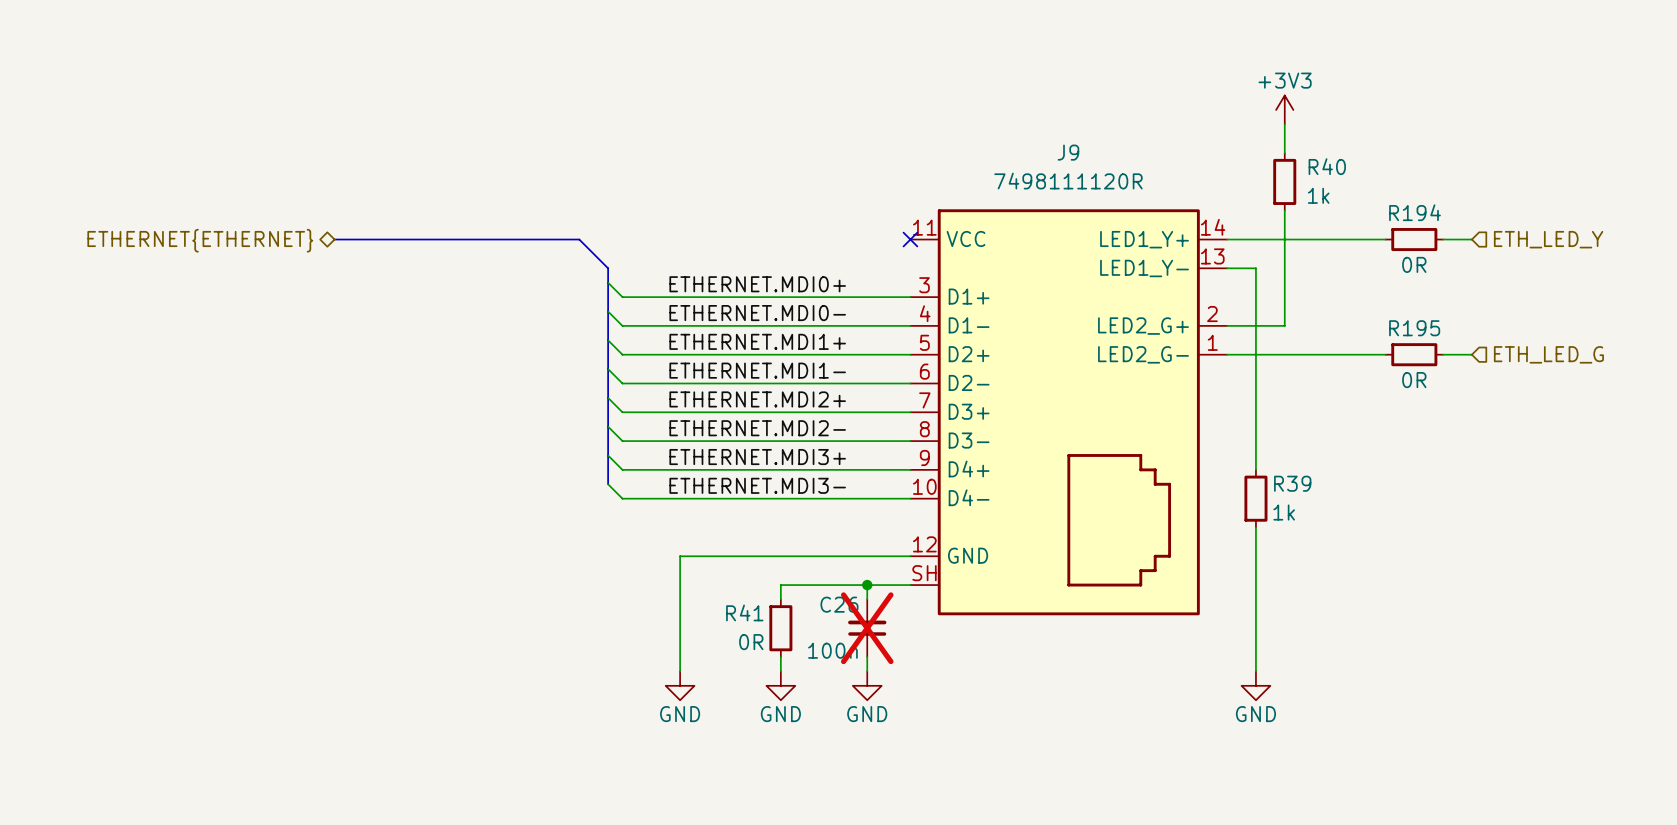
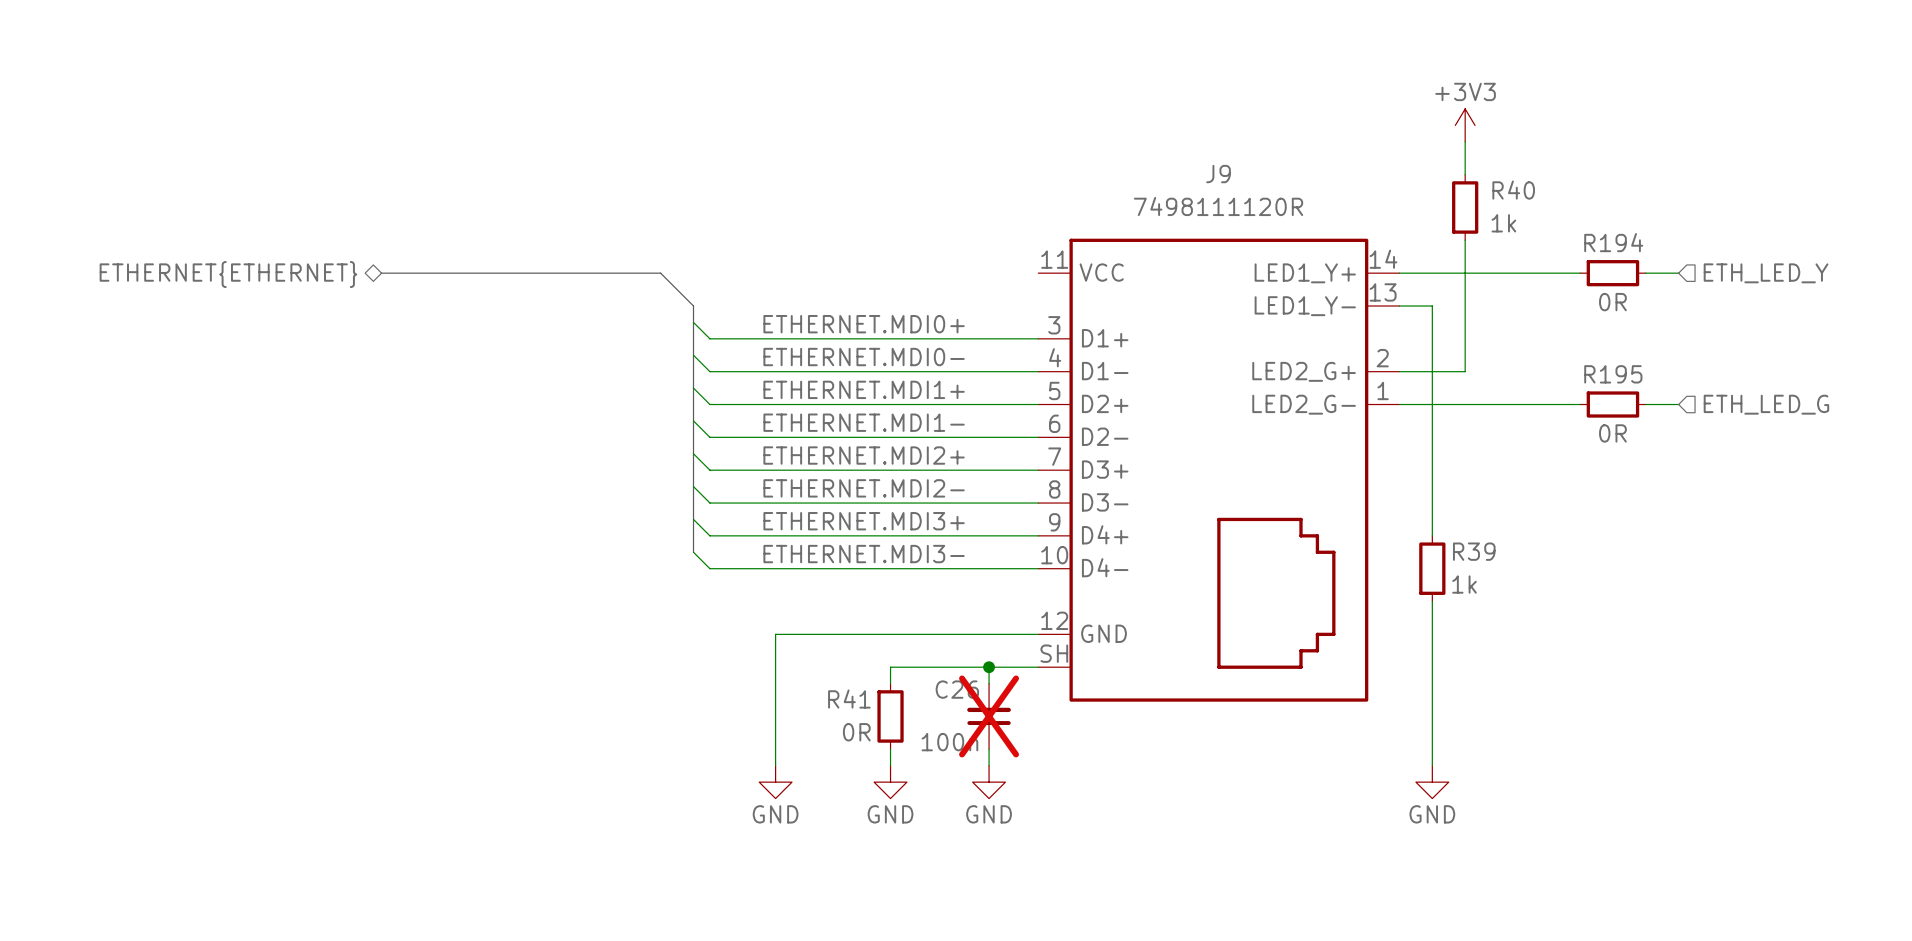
no-connect mark: (910, 239) -> none

